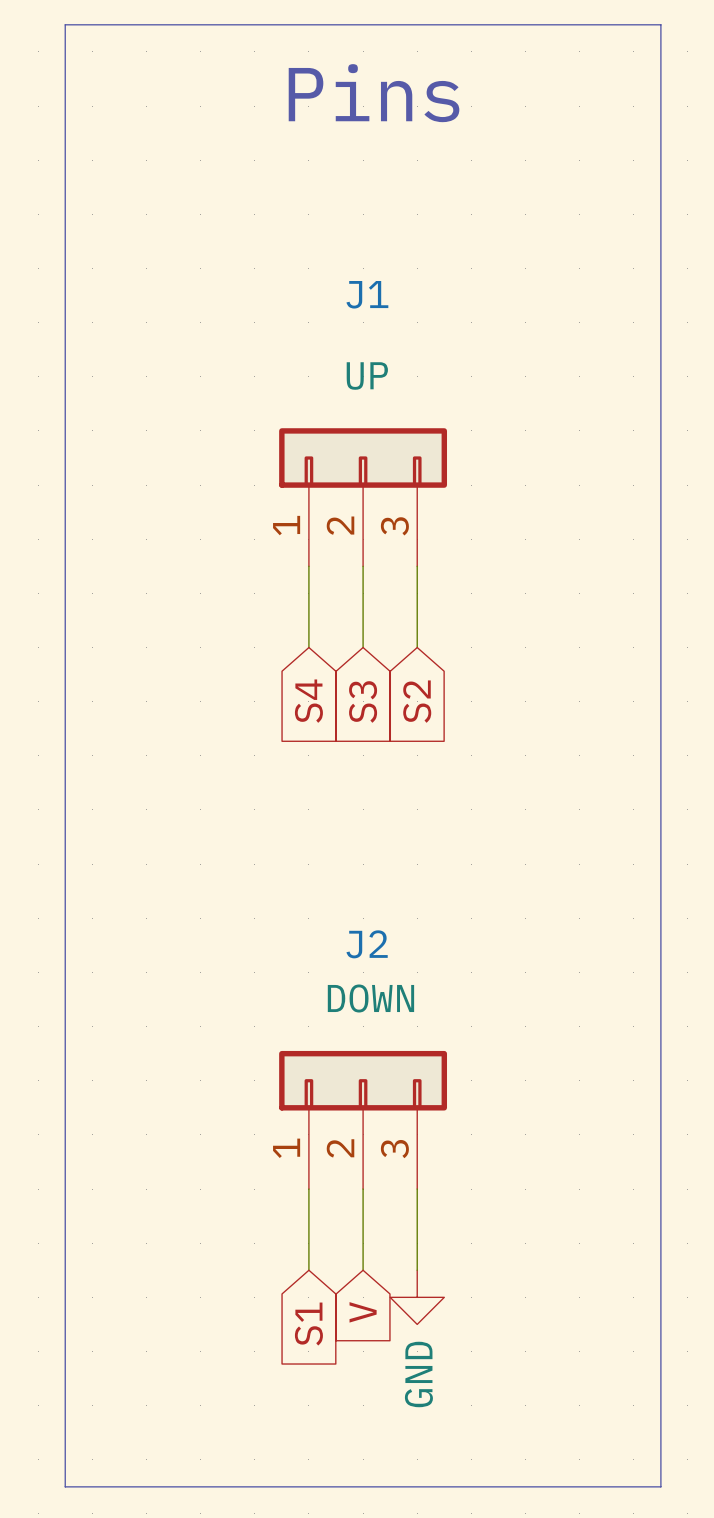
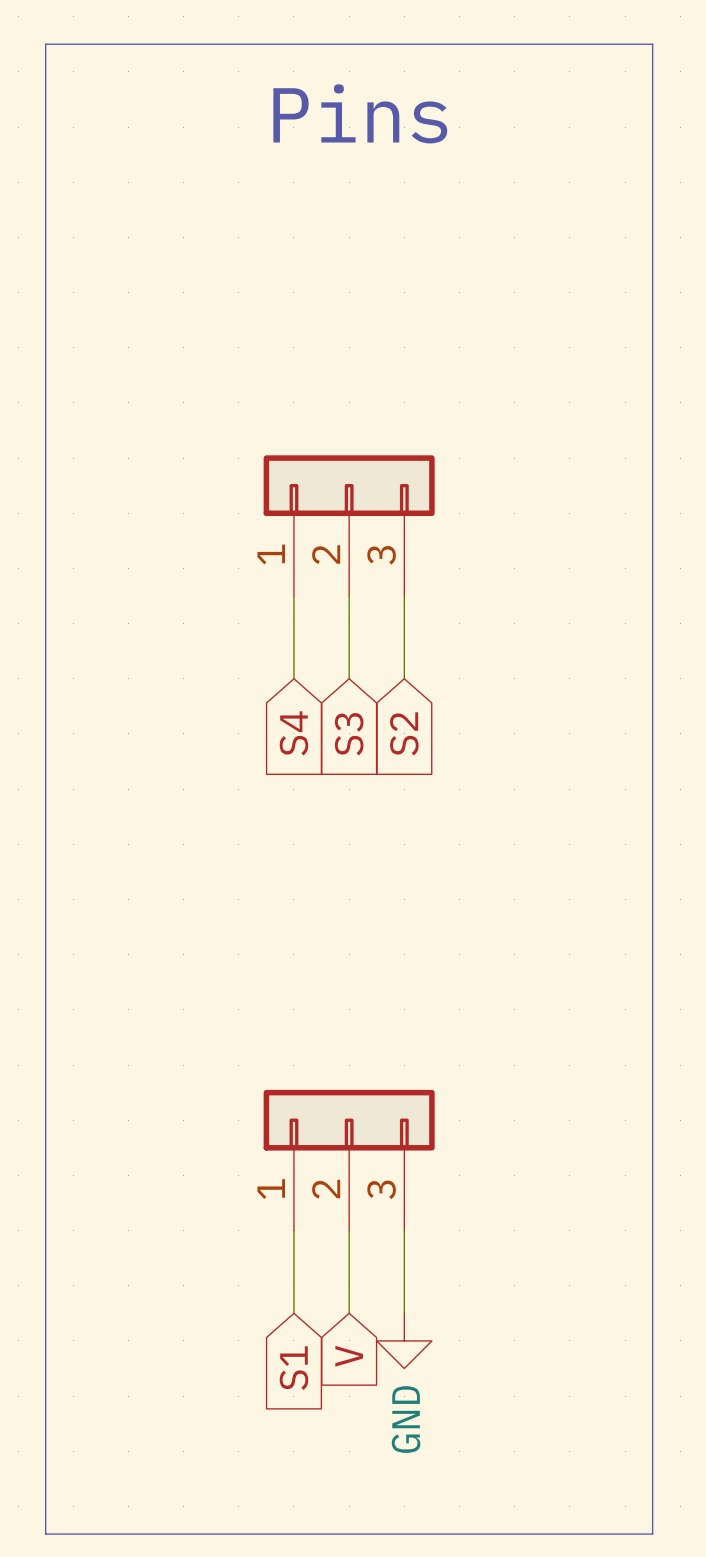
J1 name: J1 (367, 294) -> none
J1 value: UP (367, 376) -> none
J2 name: J2 (367, 944) -> none
J2 value: DOWN (370, 998) -> none

